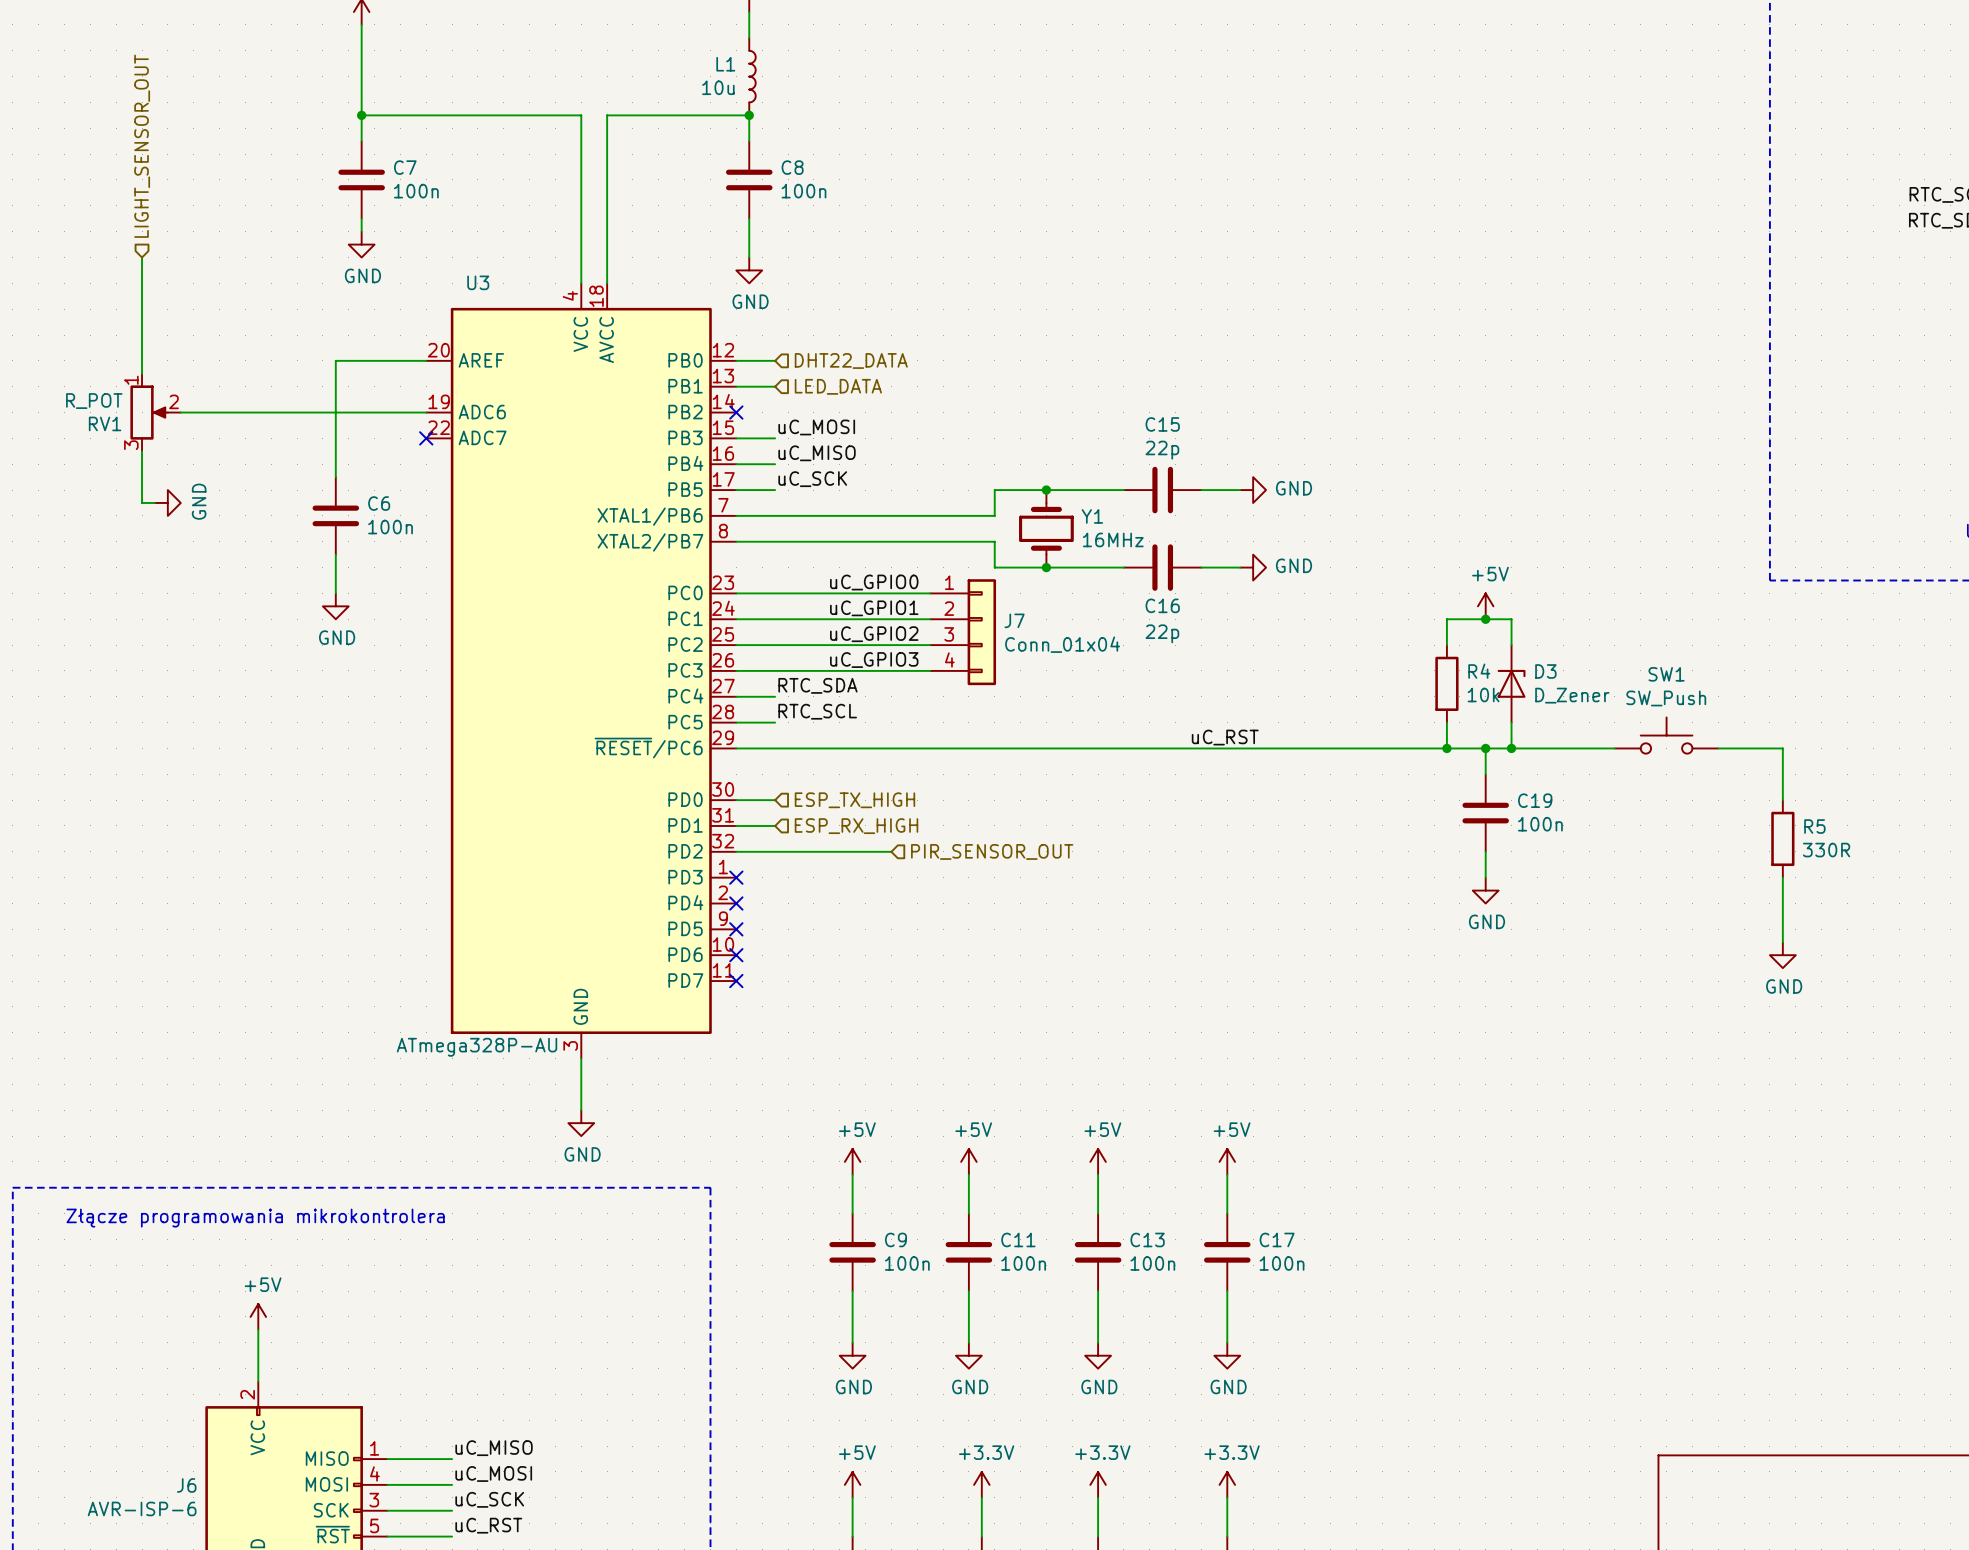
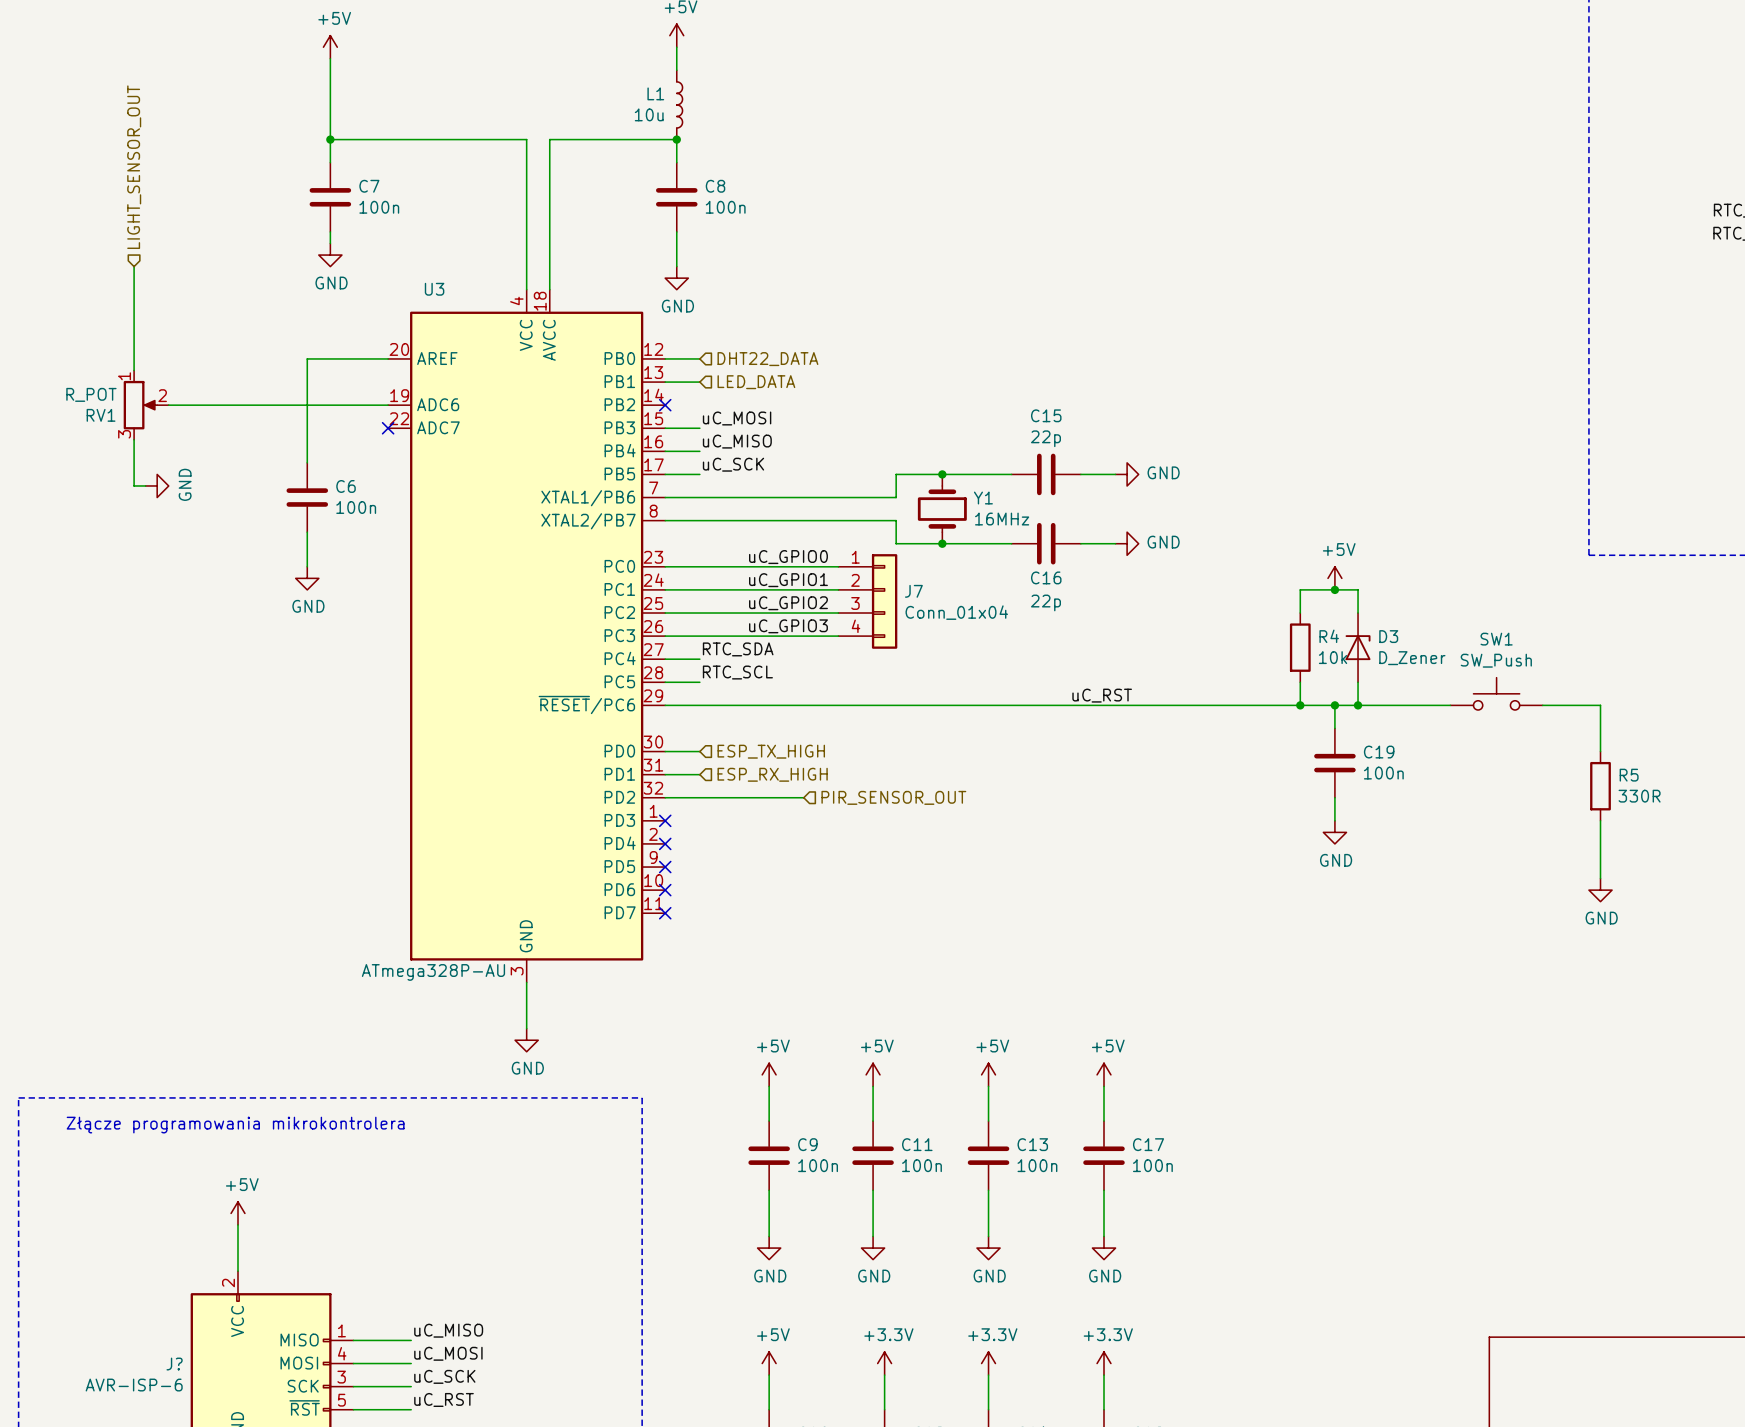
J6 name: J6 (186, 1485) -> J? (174, 1364)

